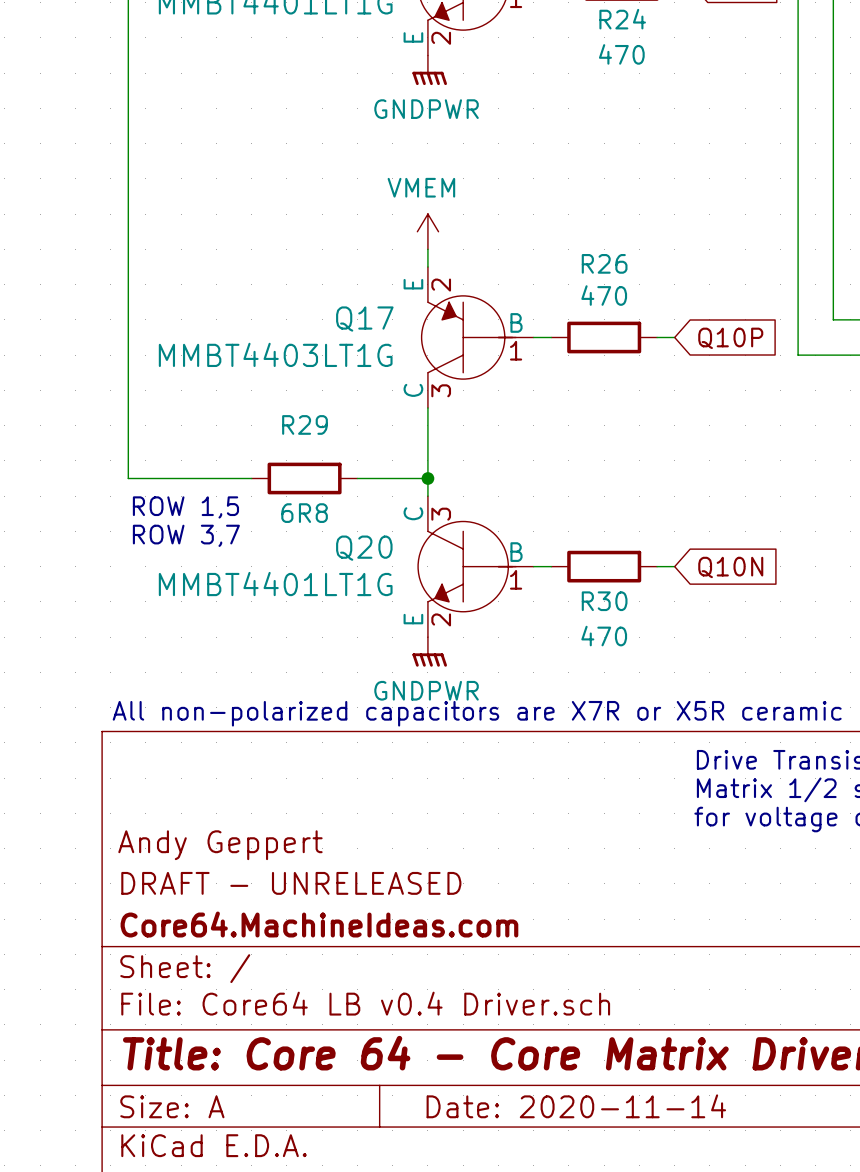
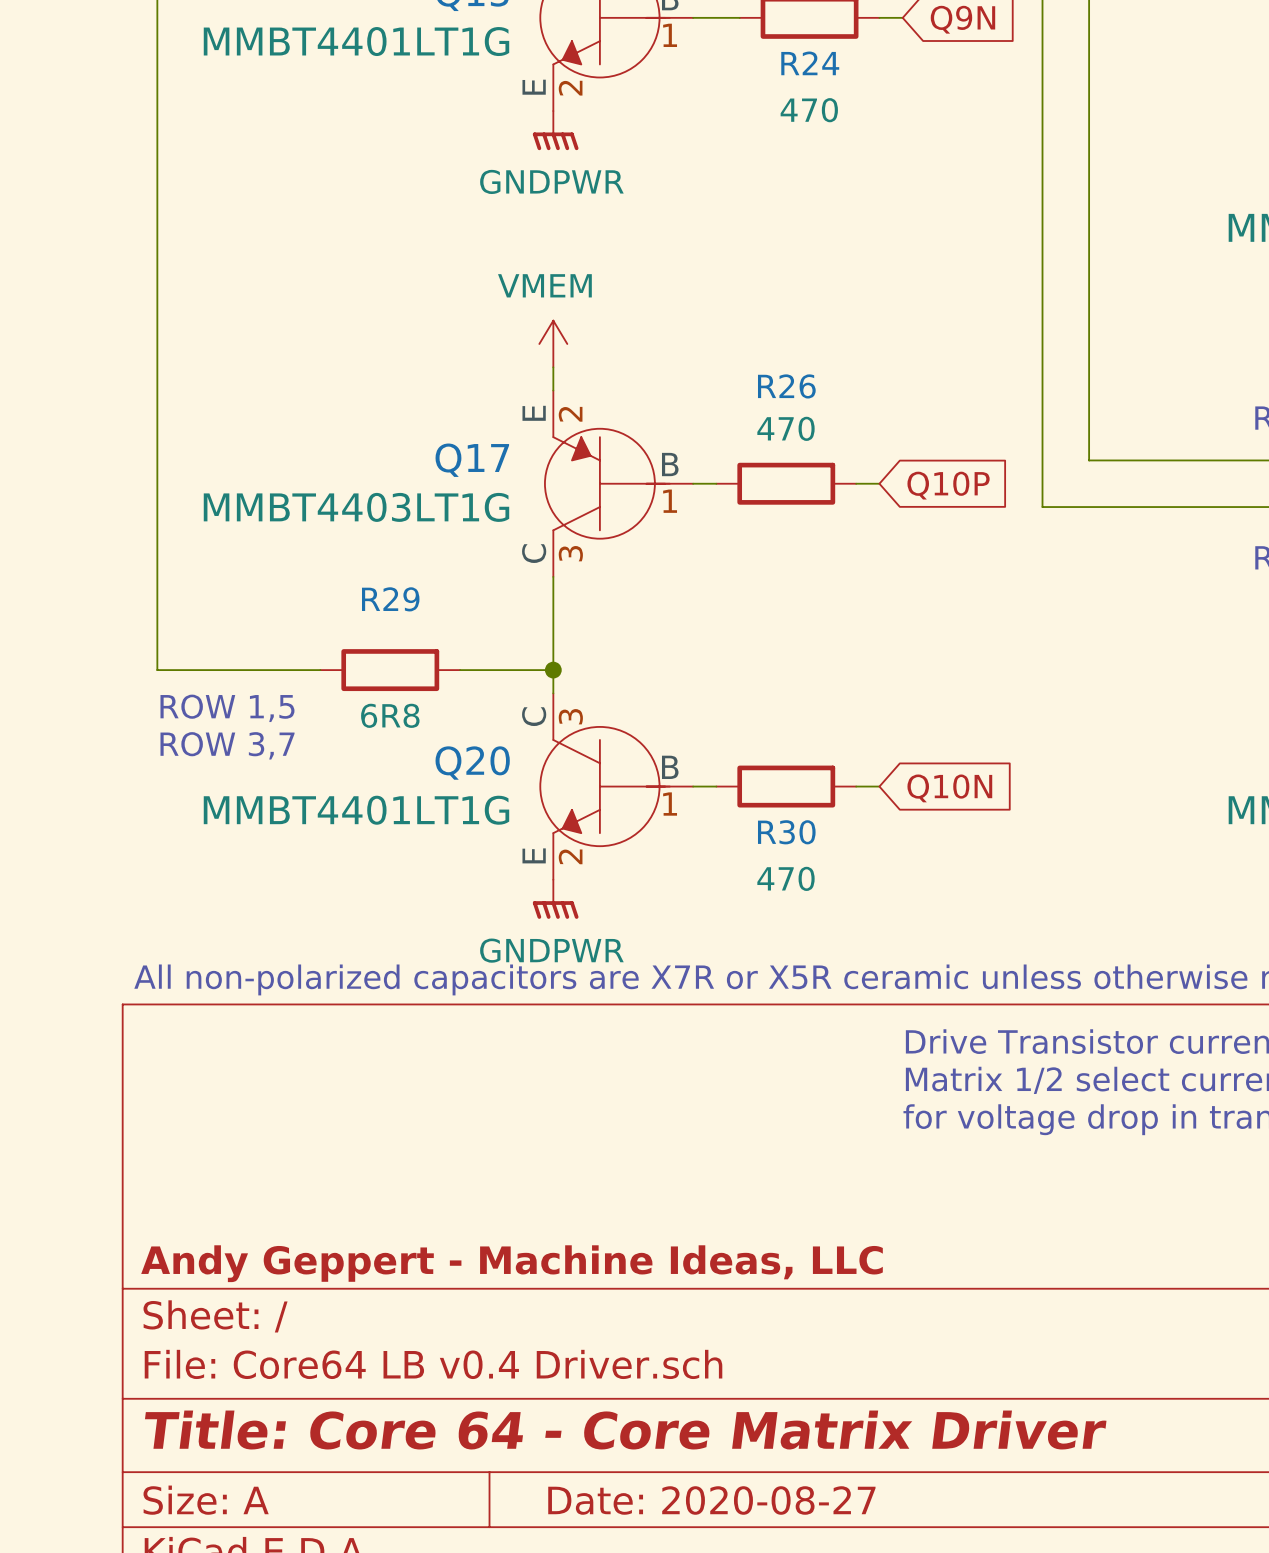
title block: Andy Geppert (220, 845) -> none
title block: DRAFT - UNRELEASED (291, 883) -> none
title block: Core64.MachineIdeas.com (319, 924) -> Andy Geppert - Machine Ideas, LLC (512, 1263)
title block: Date: 2020-11-14 (576, 1106) -> Date: 2020-08-27 (711, 1500)

